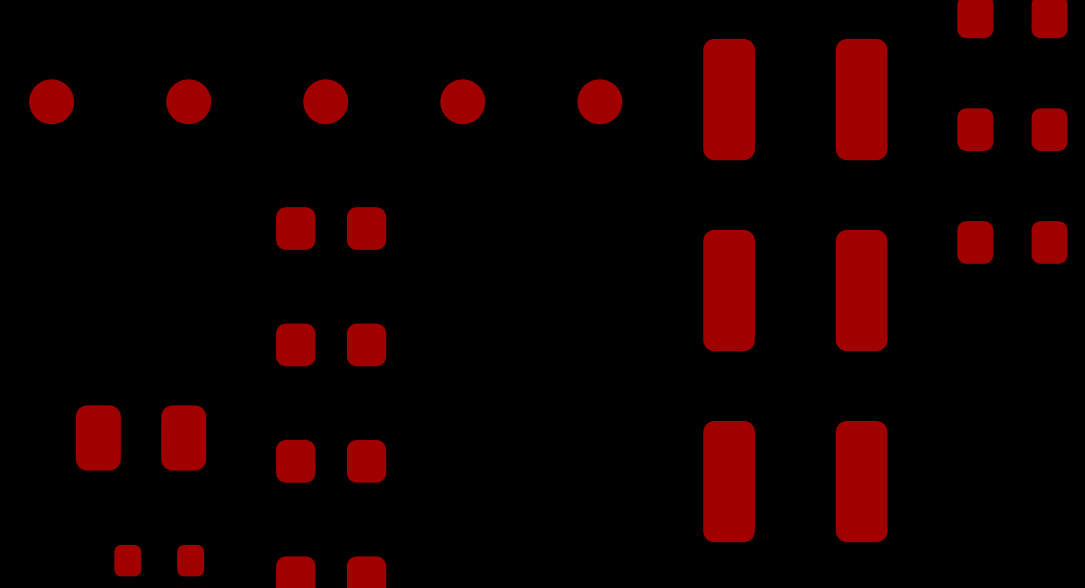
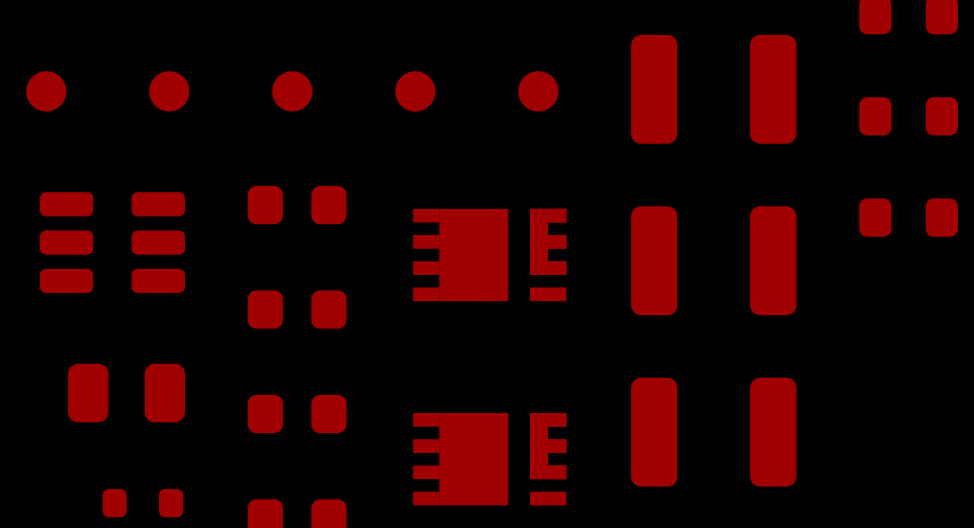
part: none -> (112, 242)
part: none -> (489, 254)
part: none -> (489, 459)

